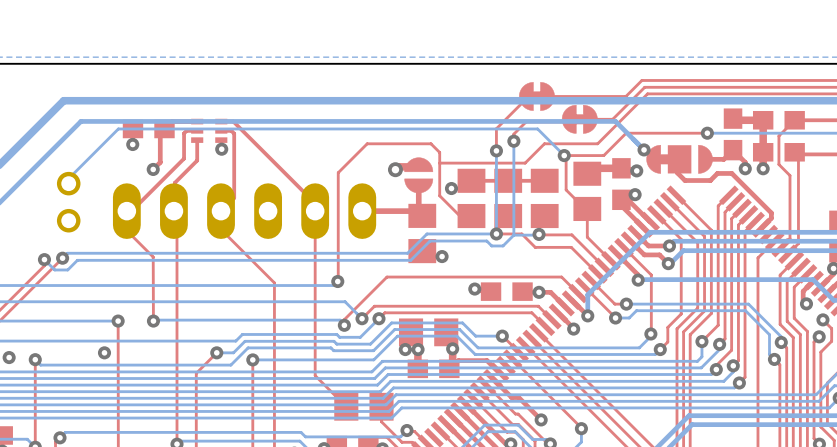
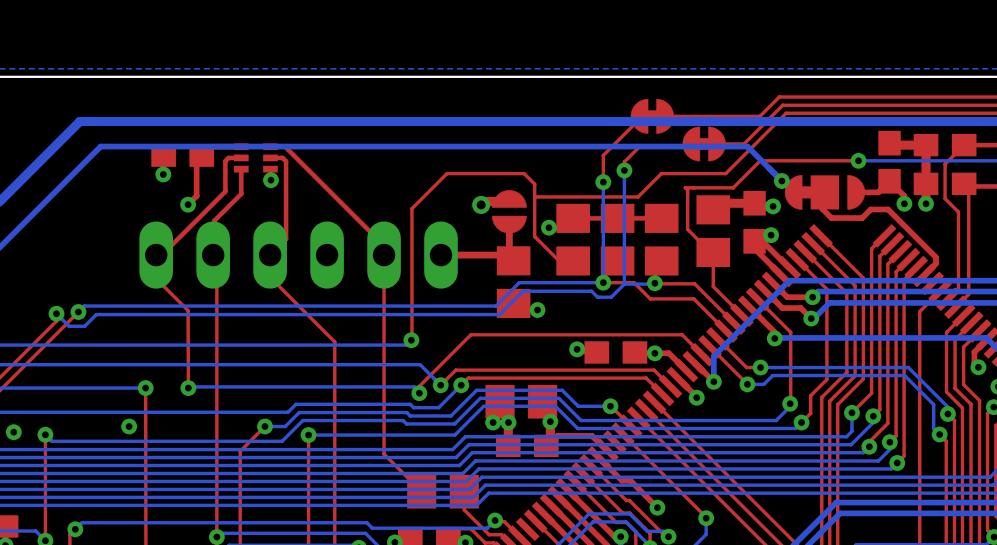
bottom track: (564, 155) (537, 128) (118, 128) (68, 178) (68, 183) -> none
via: (564, 155) -> none
part: (68, 202) -> none

